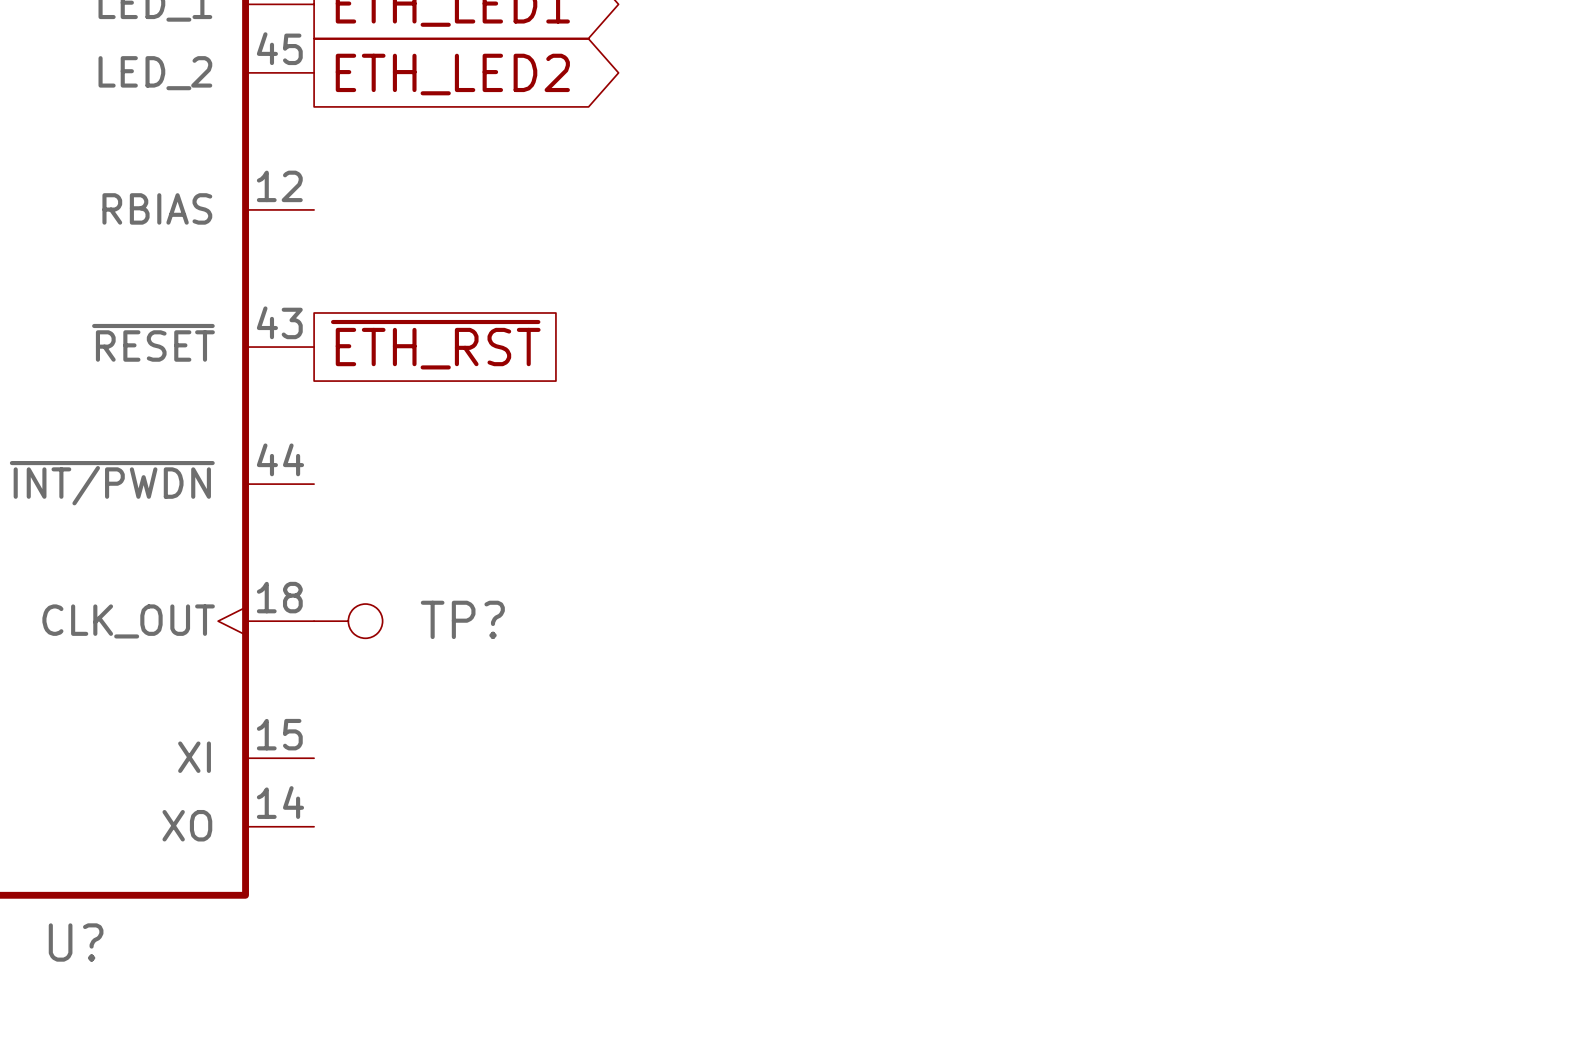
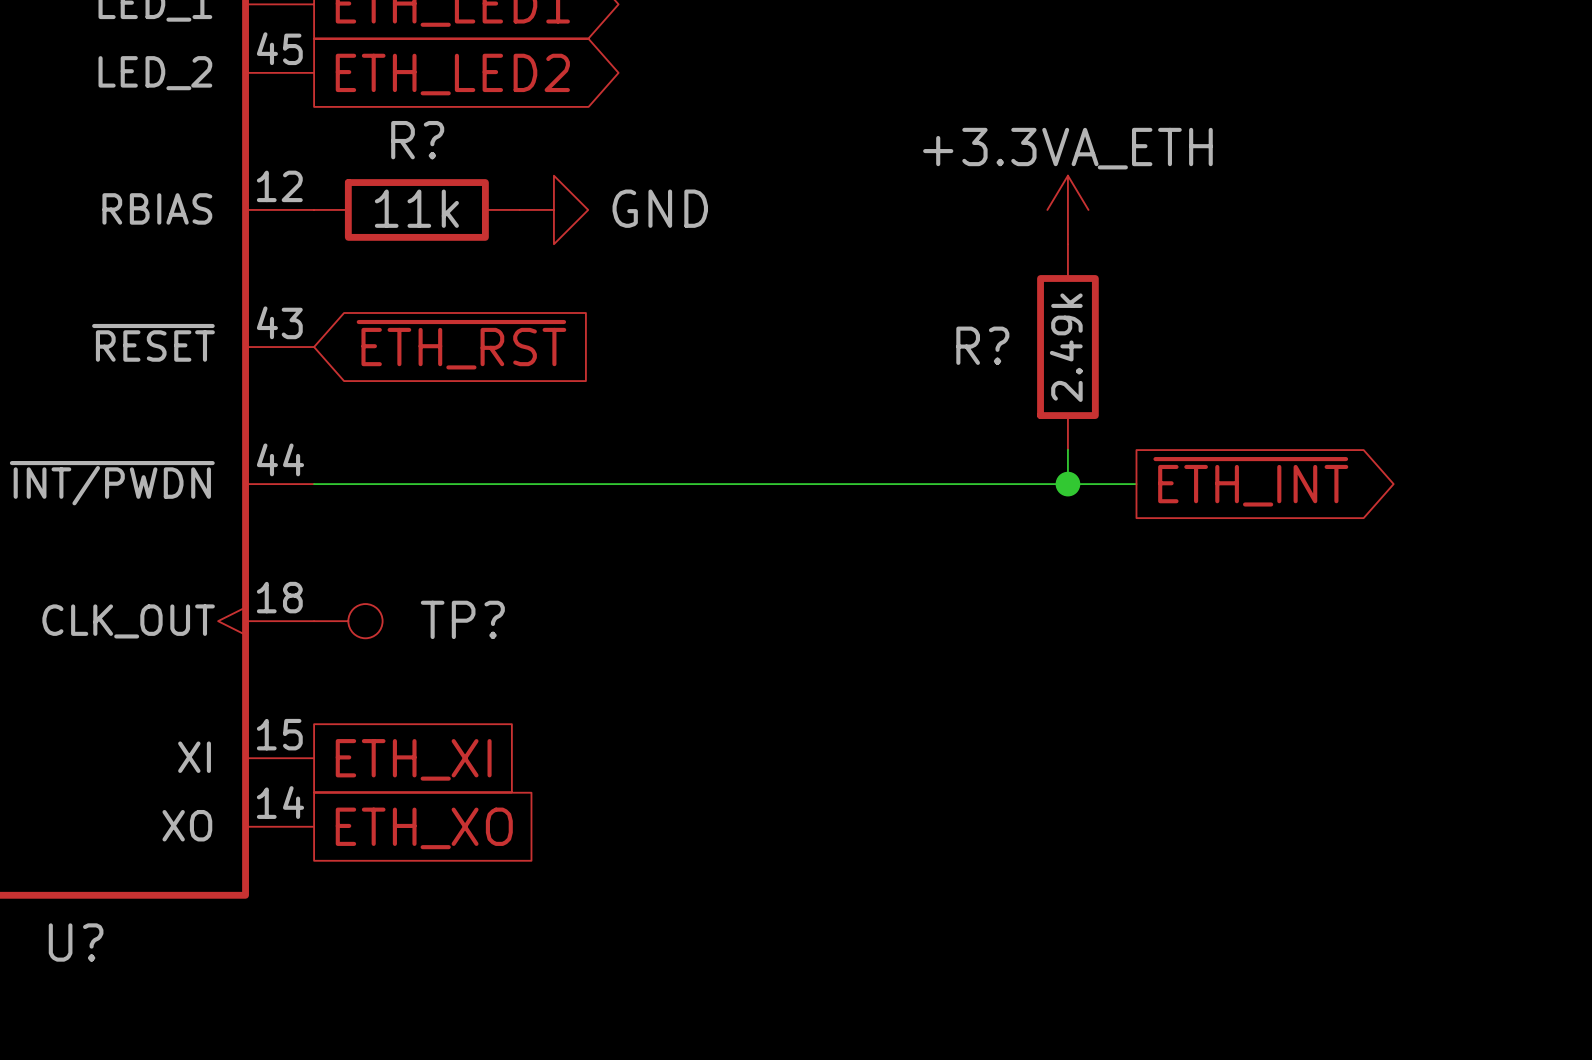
R?: none -> 11k (416, 209)
power symbol: none -> GND (553, 209)
power symbol: none -> +3.3VA_ETH (1067, 209)
global label shape: passive (435, 344) -> input (461, 344)
R?: none -> 2.49k (1067, 347)
wire: none -> (1067, 449) (1067, 484)
global label: none -> ~{ETH_INT} (1250, 481)
wire: none -> (314, 484) (1136, 484)
junction: none -> (1067, 484)
global label: none -> ETH_XI (413, 759)
global label: none -> ETH_XO (424, 828)

